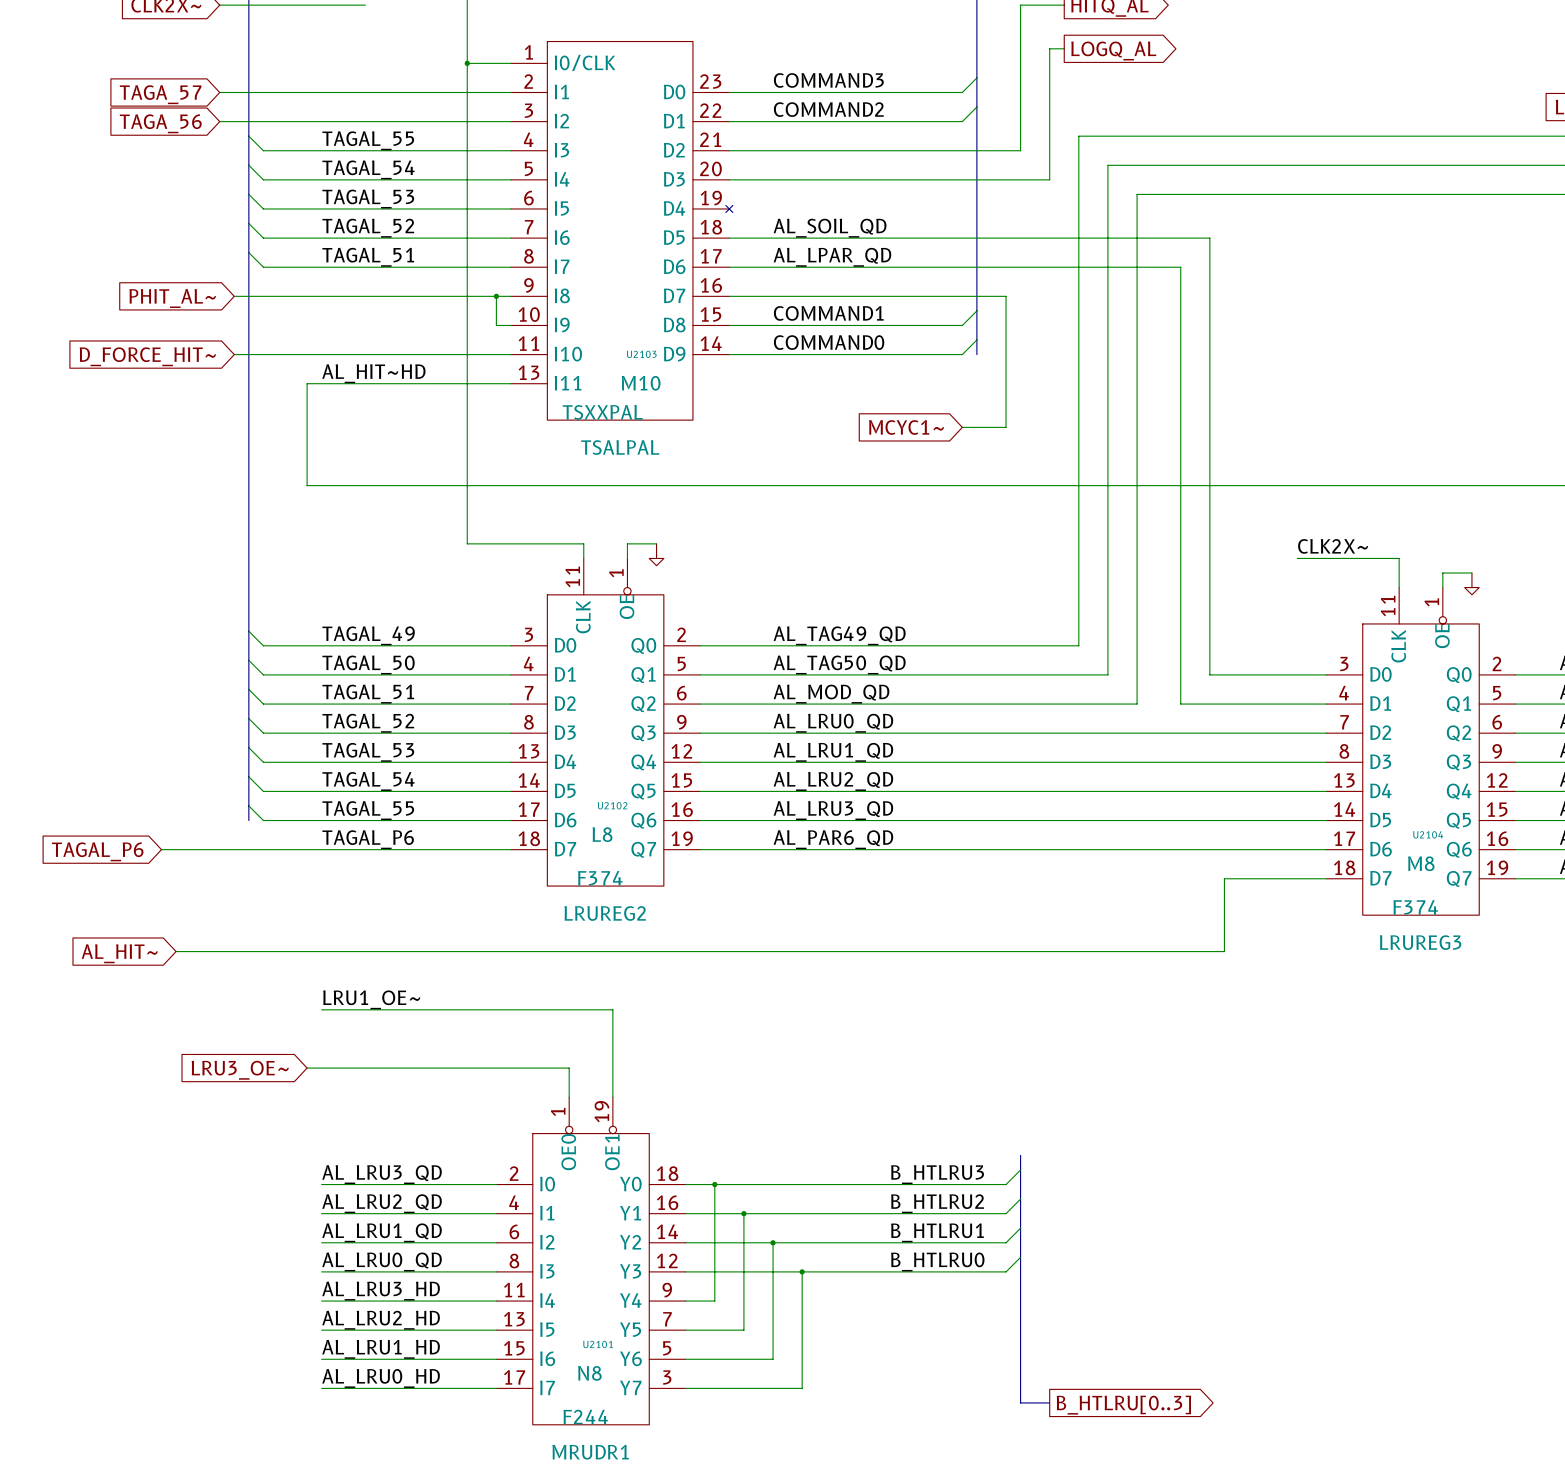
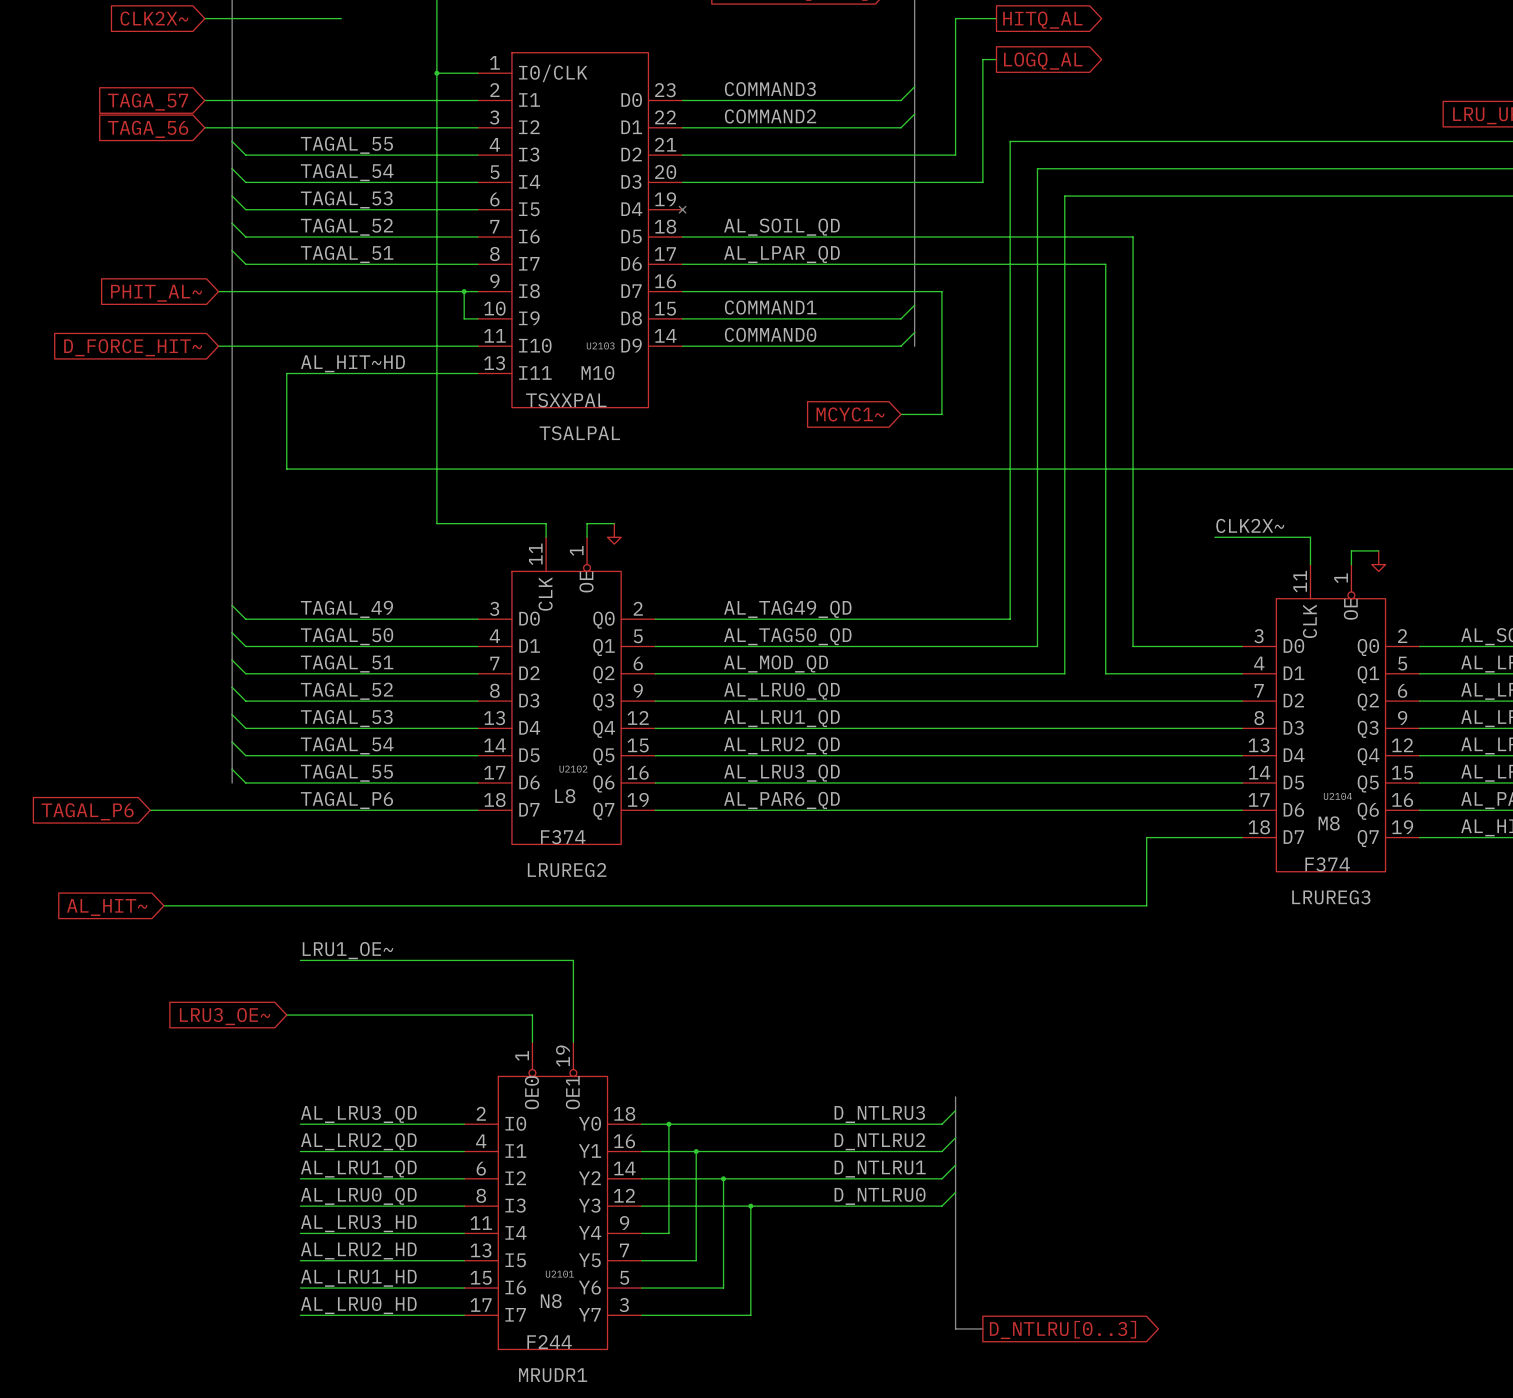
label: B_HTLRU3 (937, 1174) -> D_NTLRU3 (879, 1114)
label: B_HTLRU2 (937, 1203) -> D_NTLRU2 (879, 1141)
label: B_HTLRU1 (937, 1232) -> D_NTLRU1 (880, 1169)
label: B_HTLRU0 (937, 1261) -> D_NTLRU0 (880, 1196)
global label: B_HTLRU[0..3] (1123, 1405) -> D_NTLRU[0..3] (1062, 1330)

